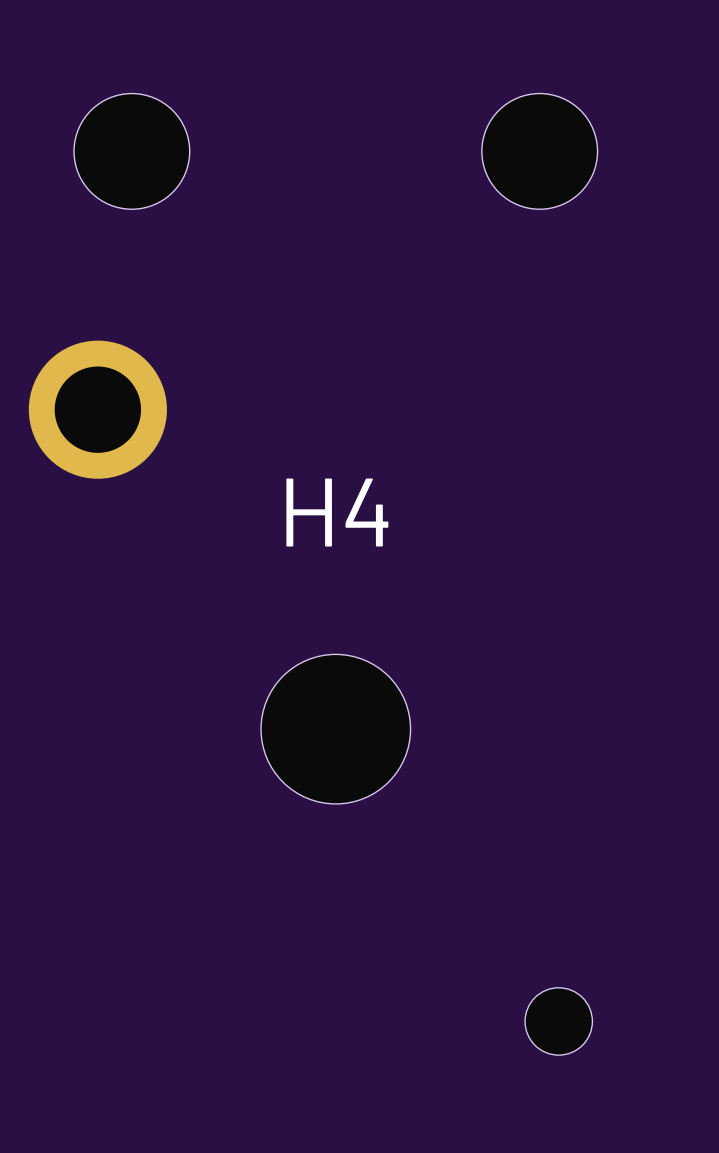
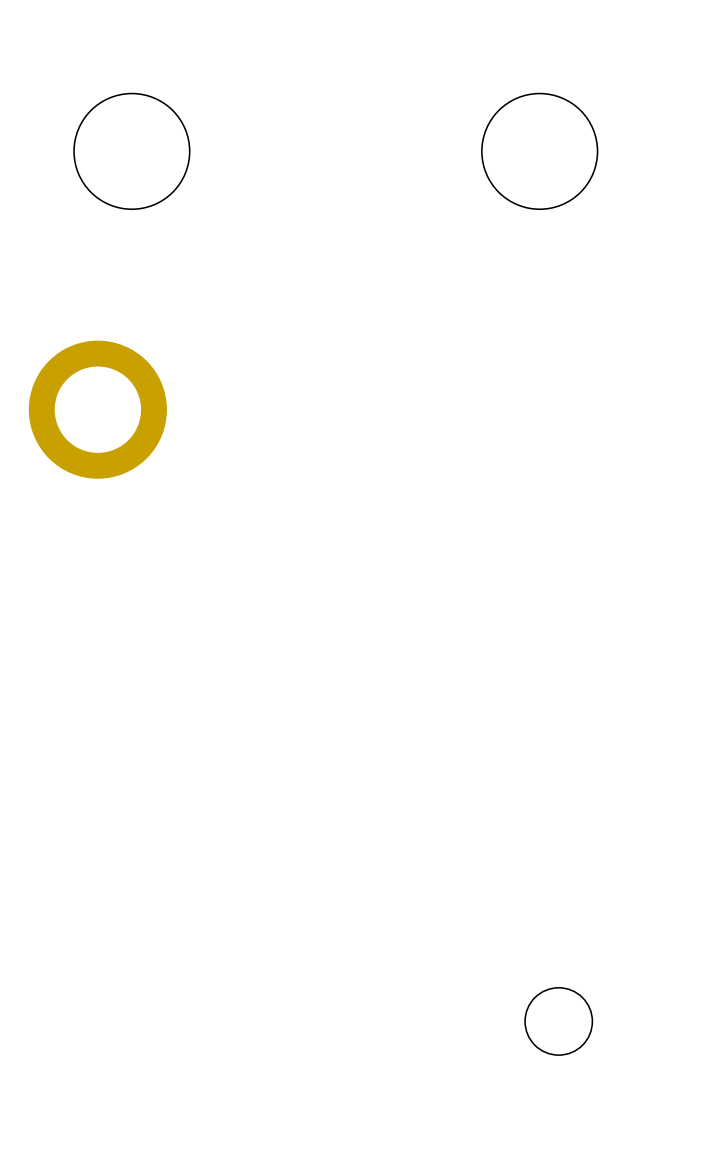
H4: (335, 729) -> none

